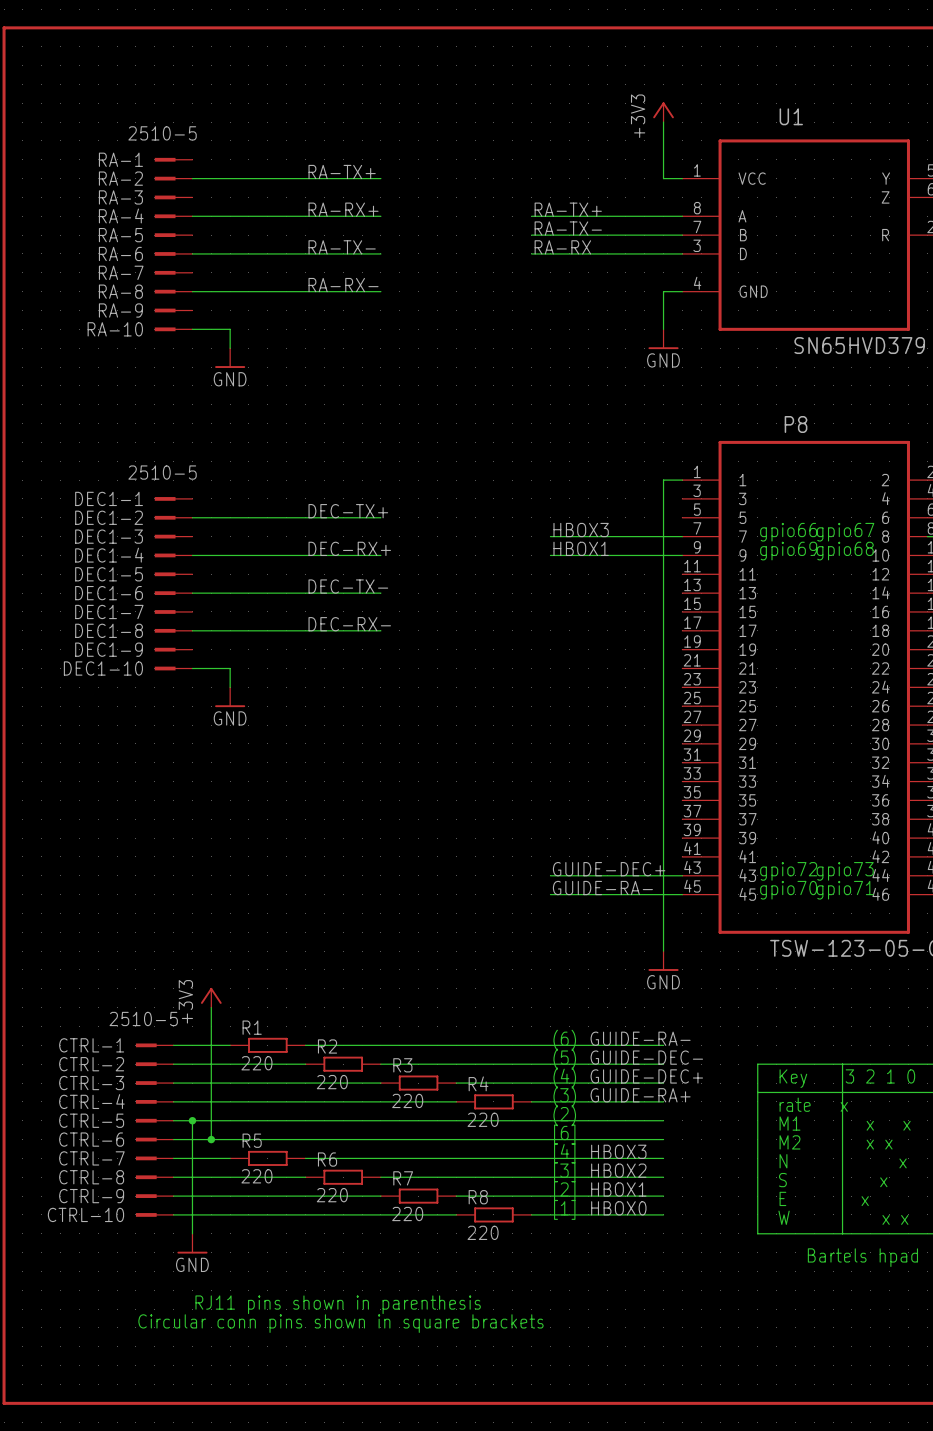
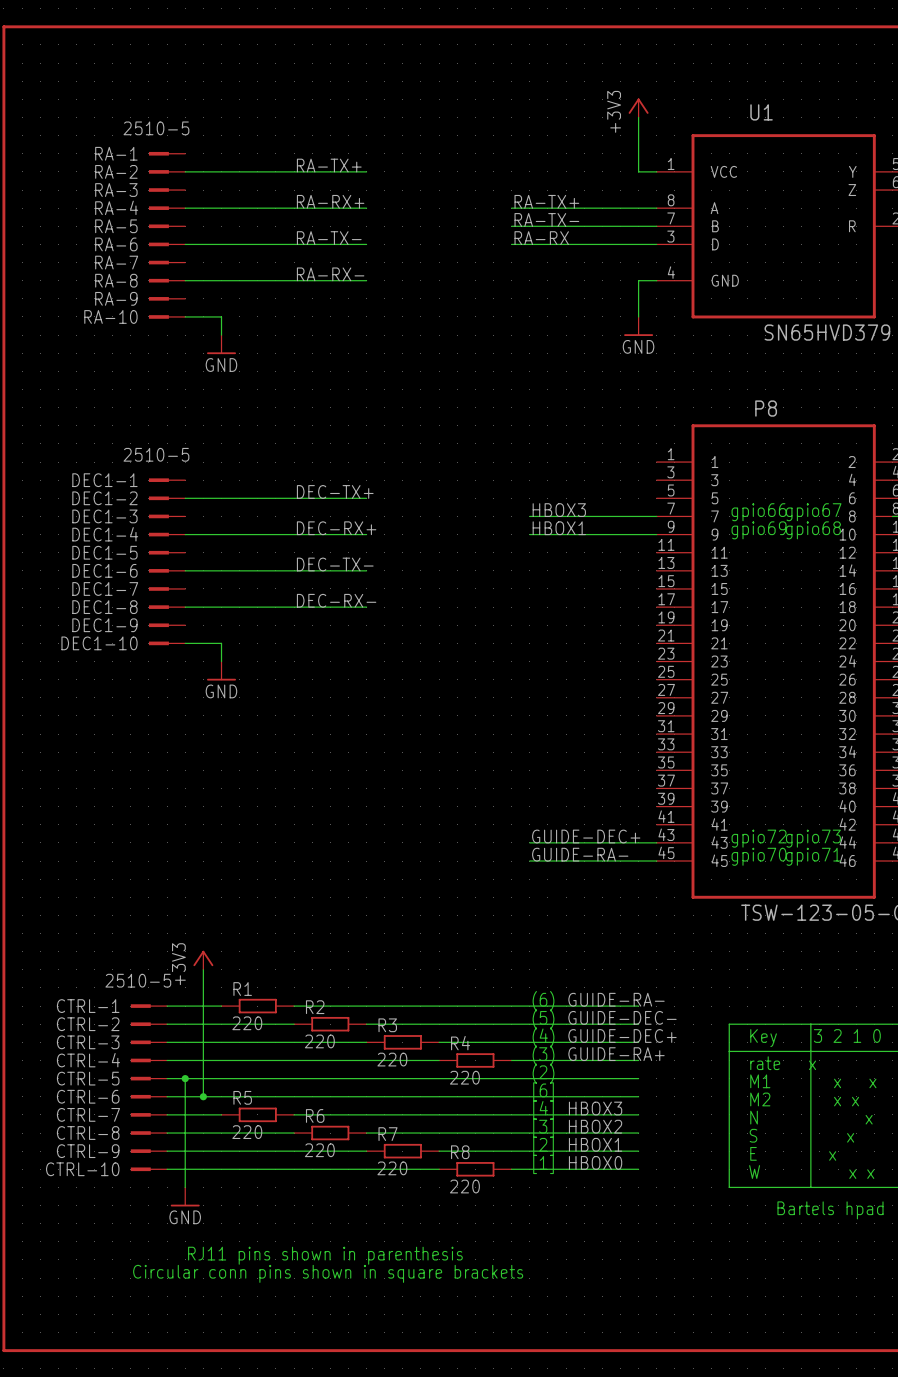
wire: (682, 480) (663, 480) (663, 951) -> none
power symbol: GND (663, 961) -> none

